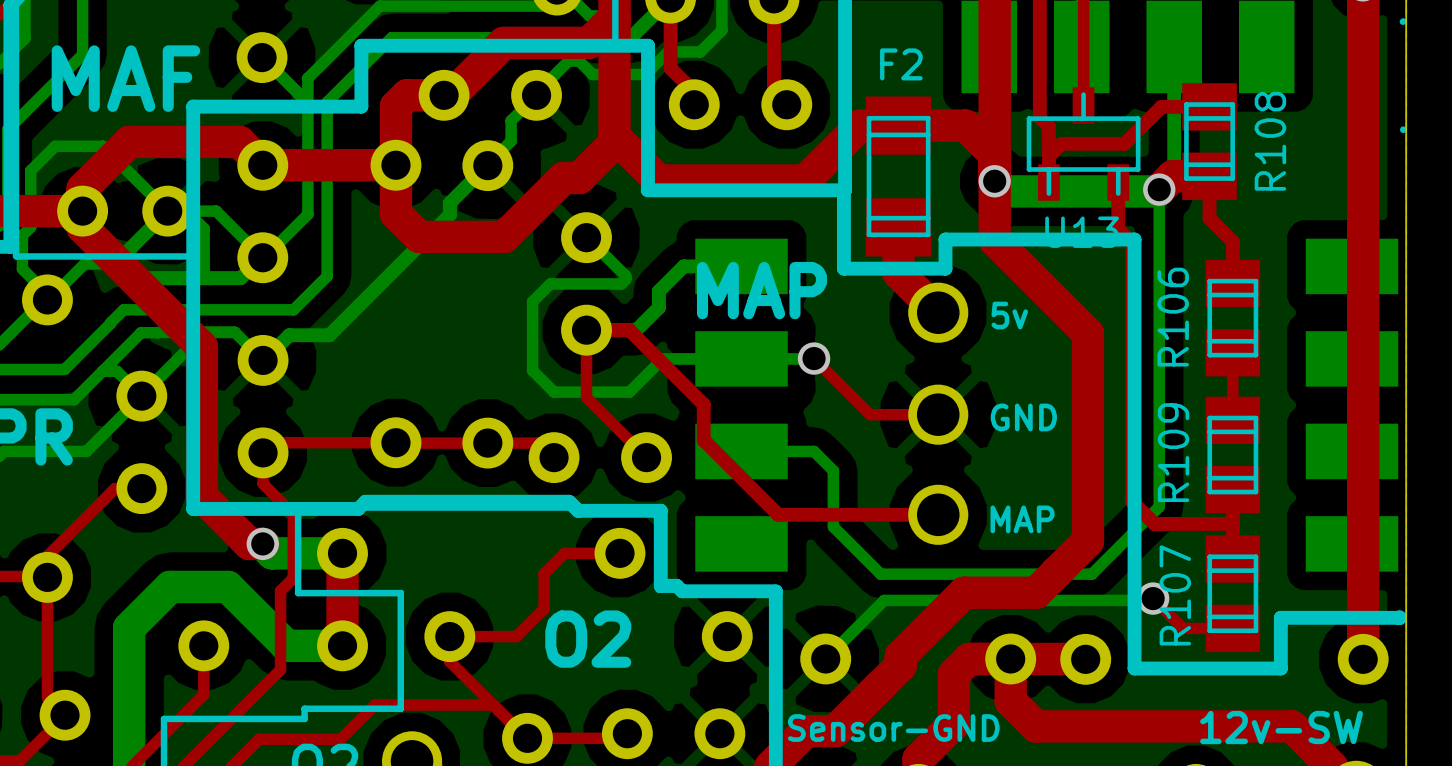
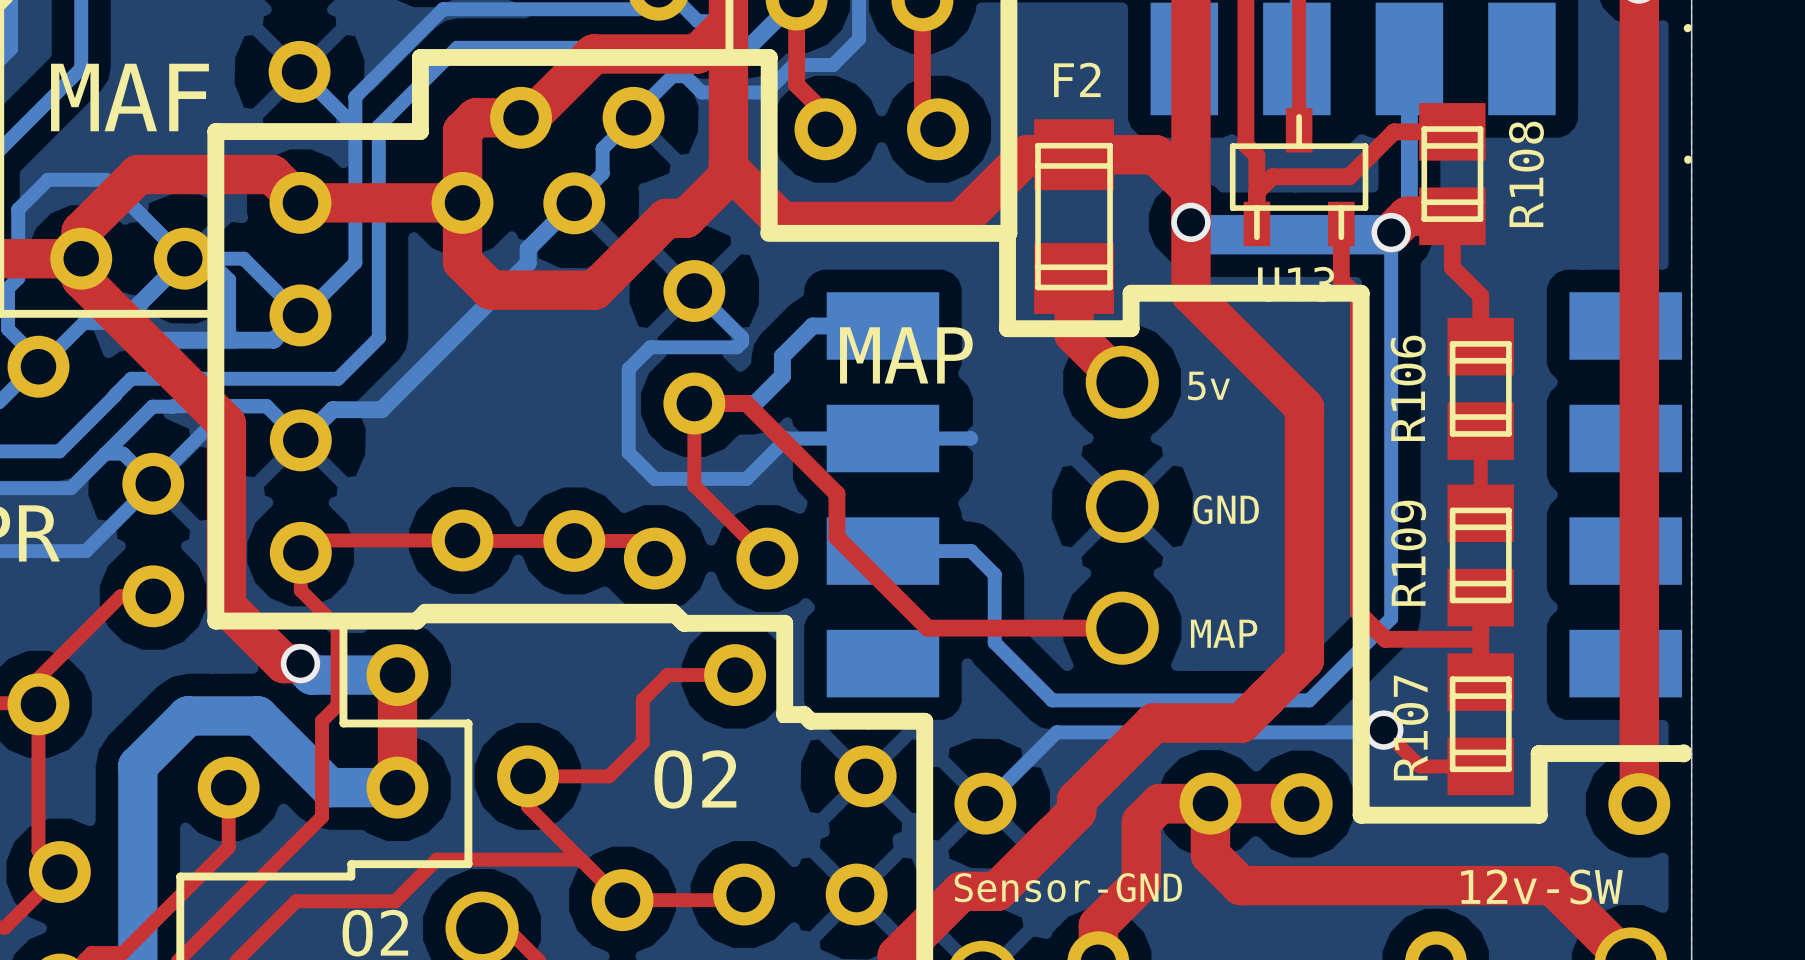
top track: (814, 358) (870, 414) (938, 414) -> none
via: (814, 358) -> none

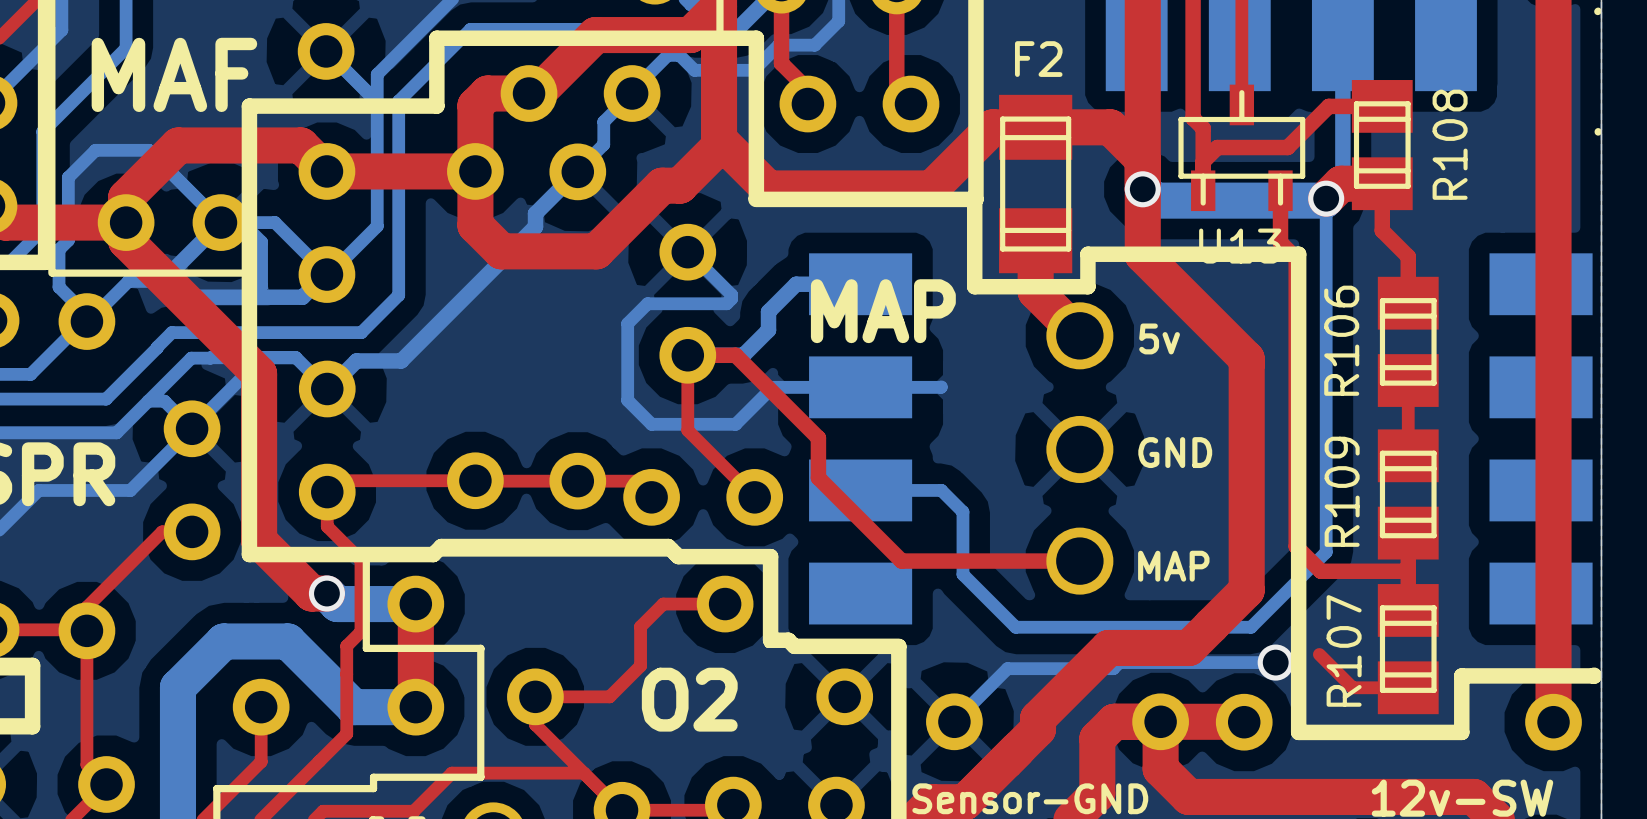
bottom track: (1383, 730) (1381, 732) (1056, 732) (1043, 745) -> (1275, 662) (1119, 662) (1113, 668) (1007, 668)
via position: (1383, 730) -> (1275, 662)

